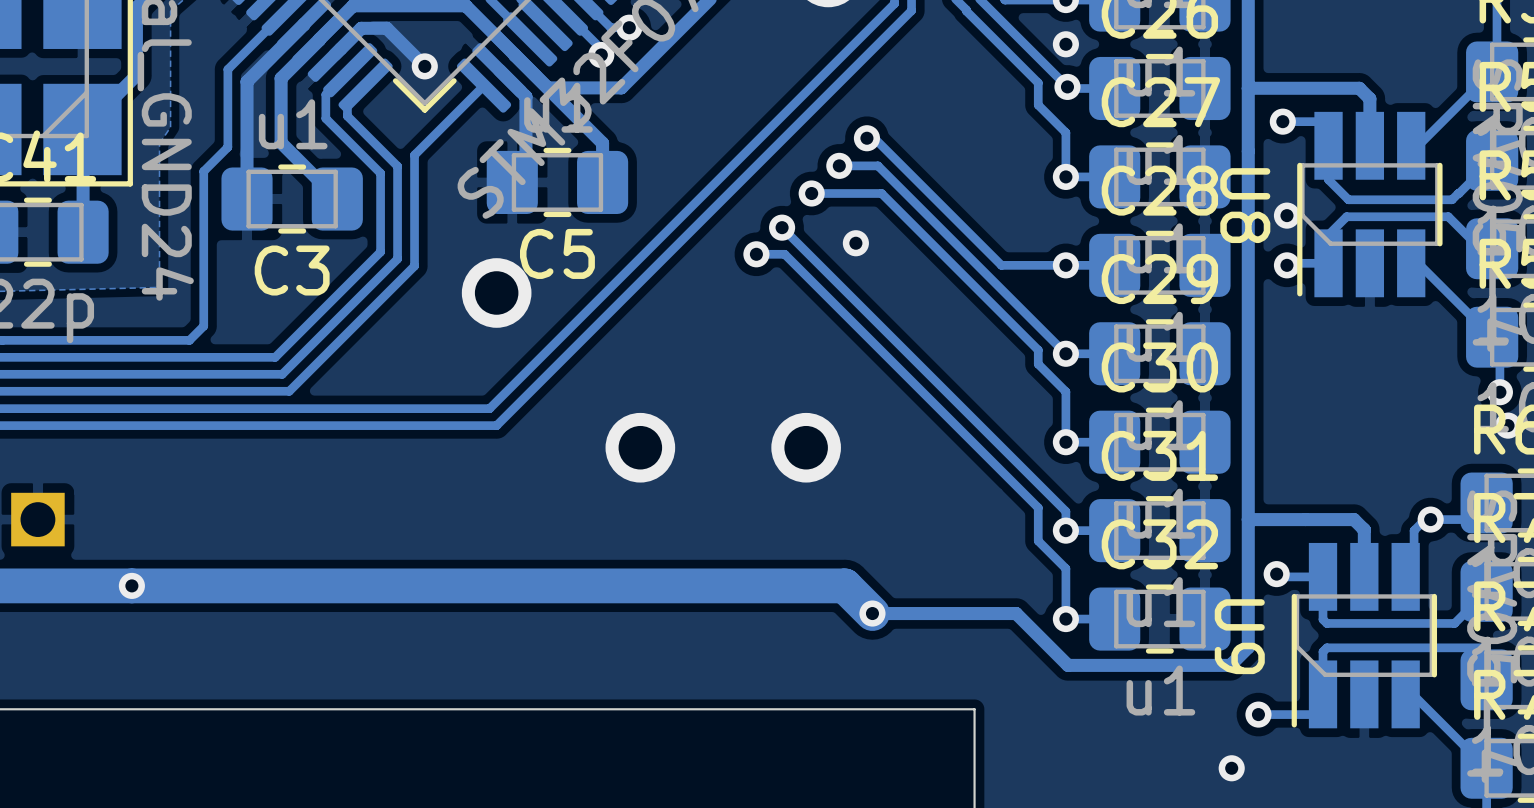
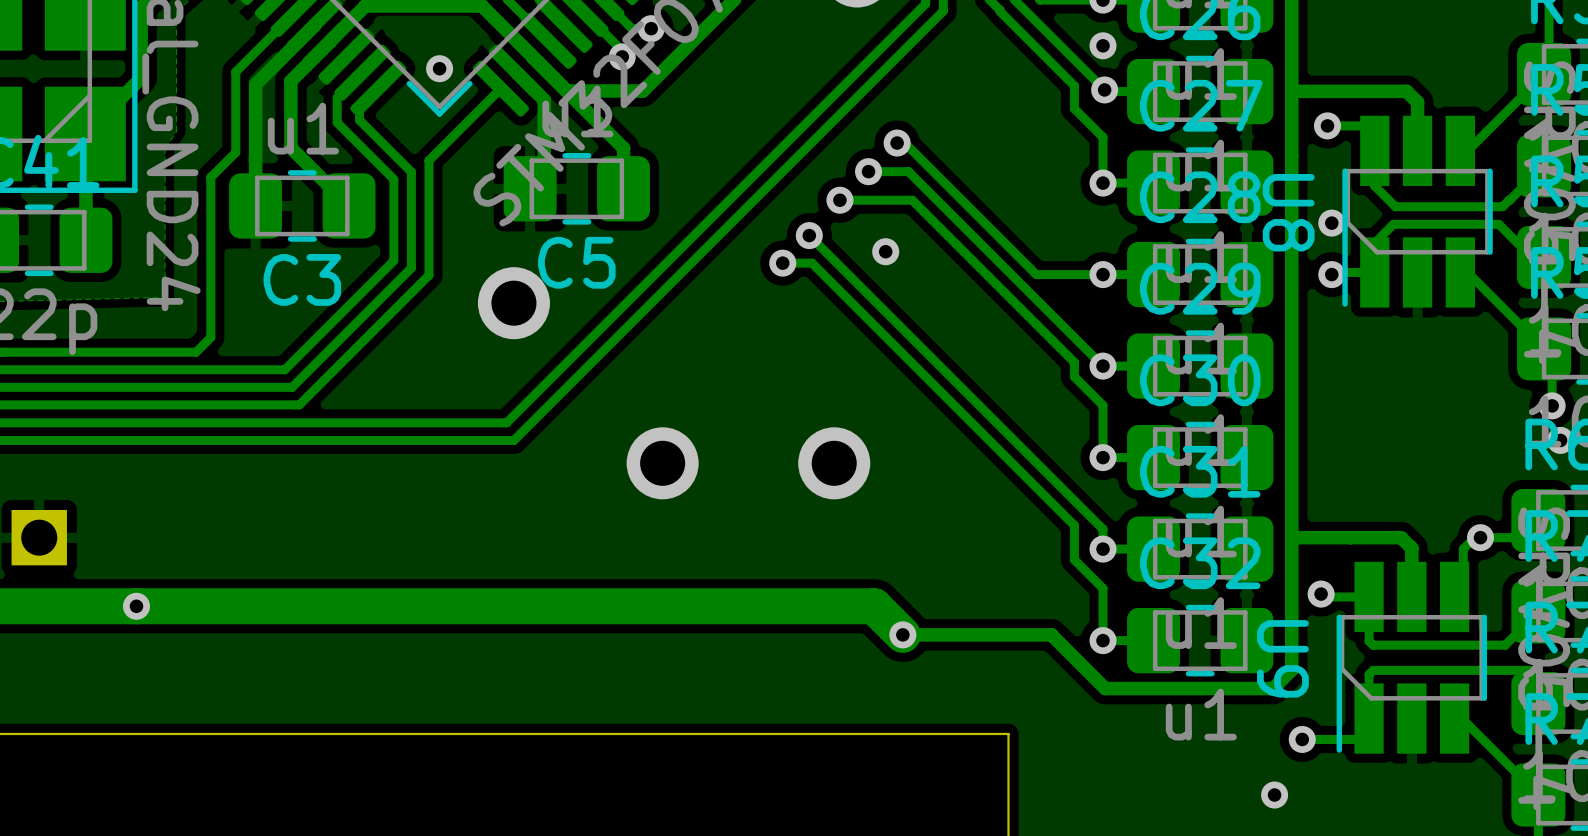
track: (334, 54) (361, 28) (386, 28) (424, 66) -> none

